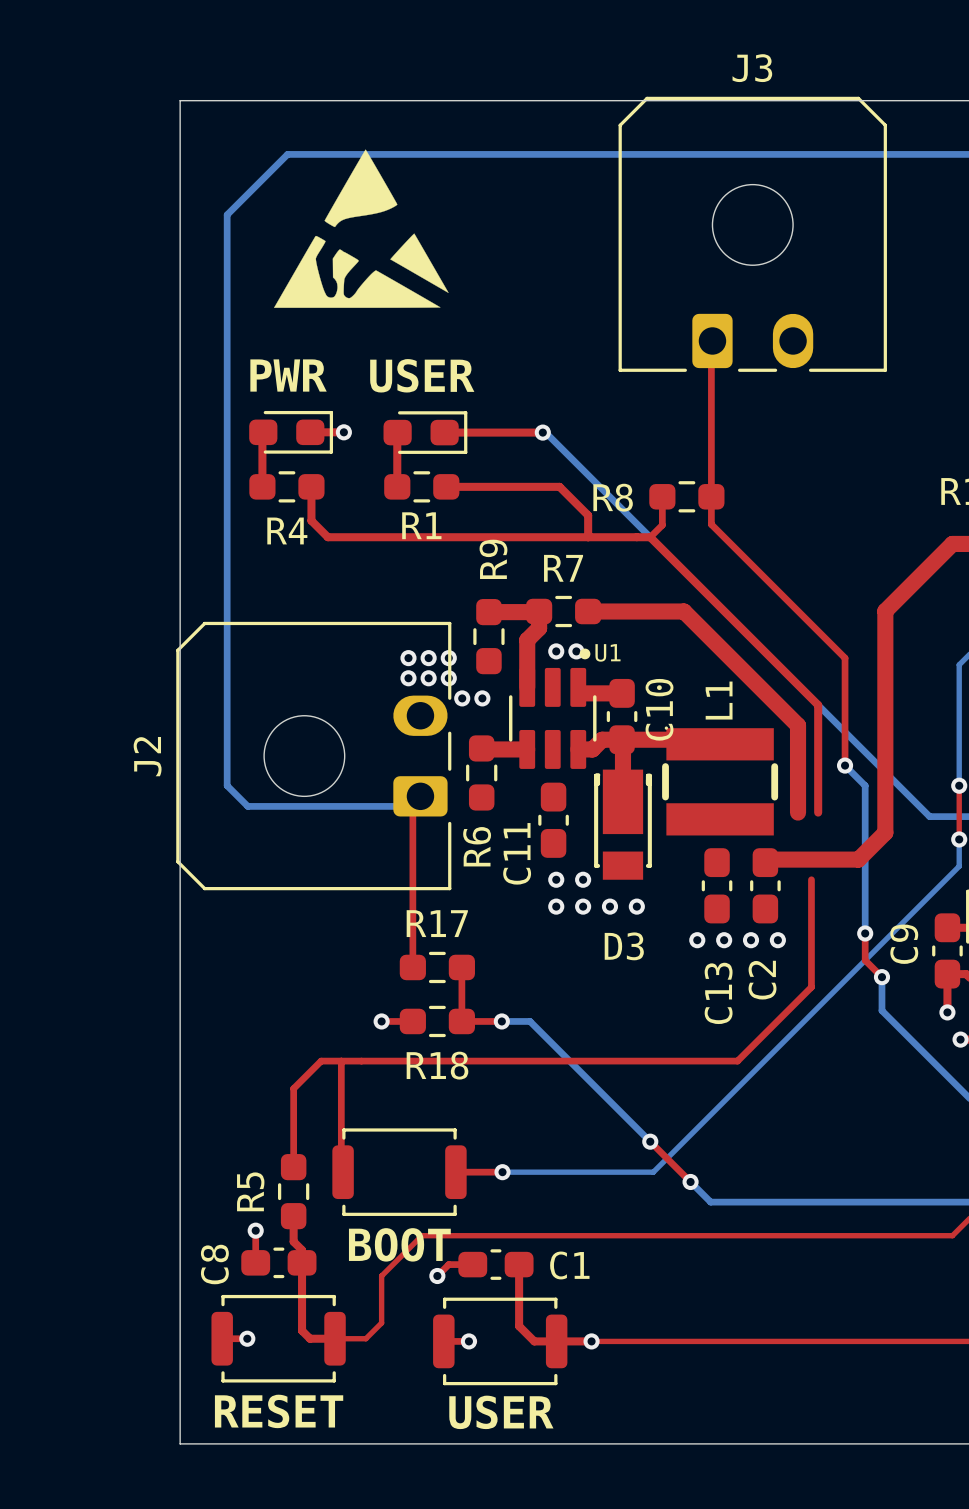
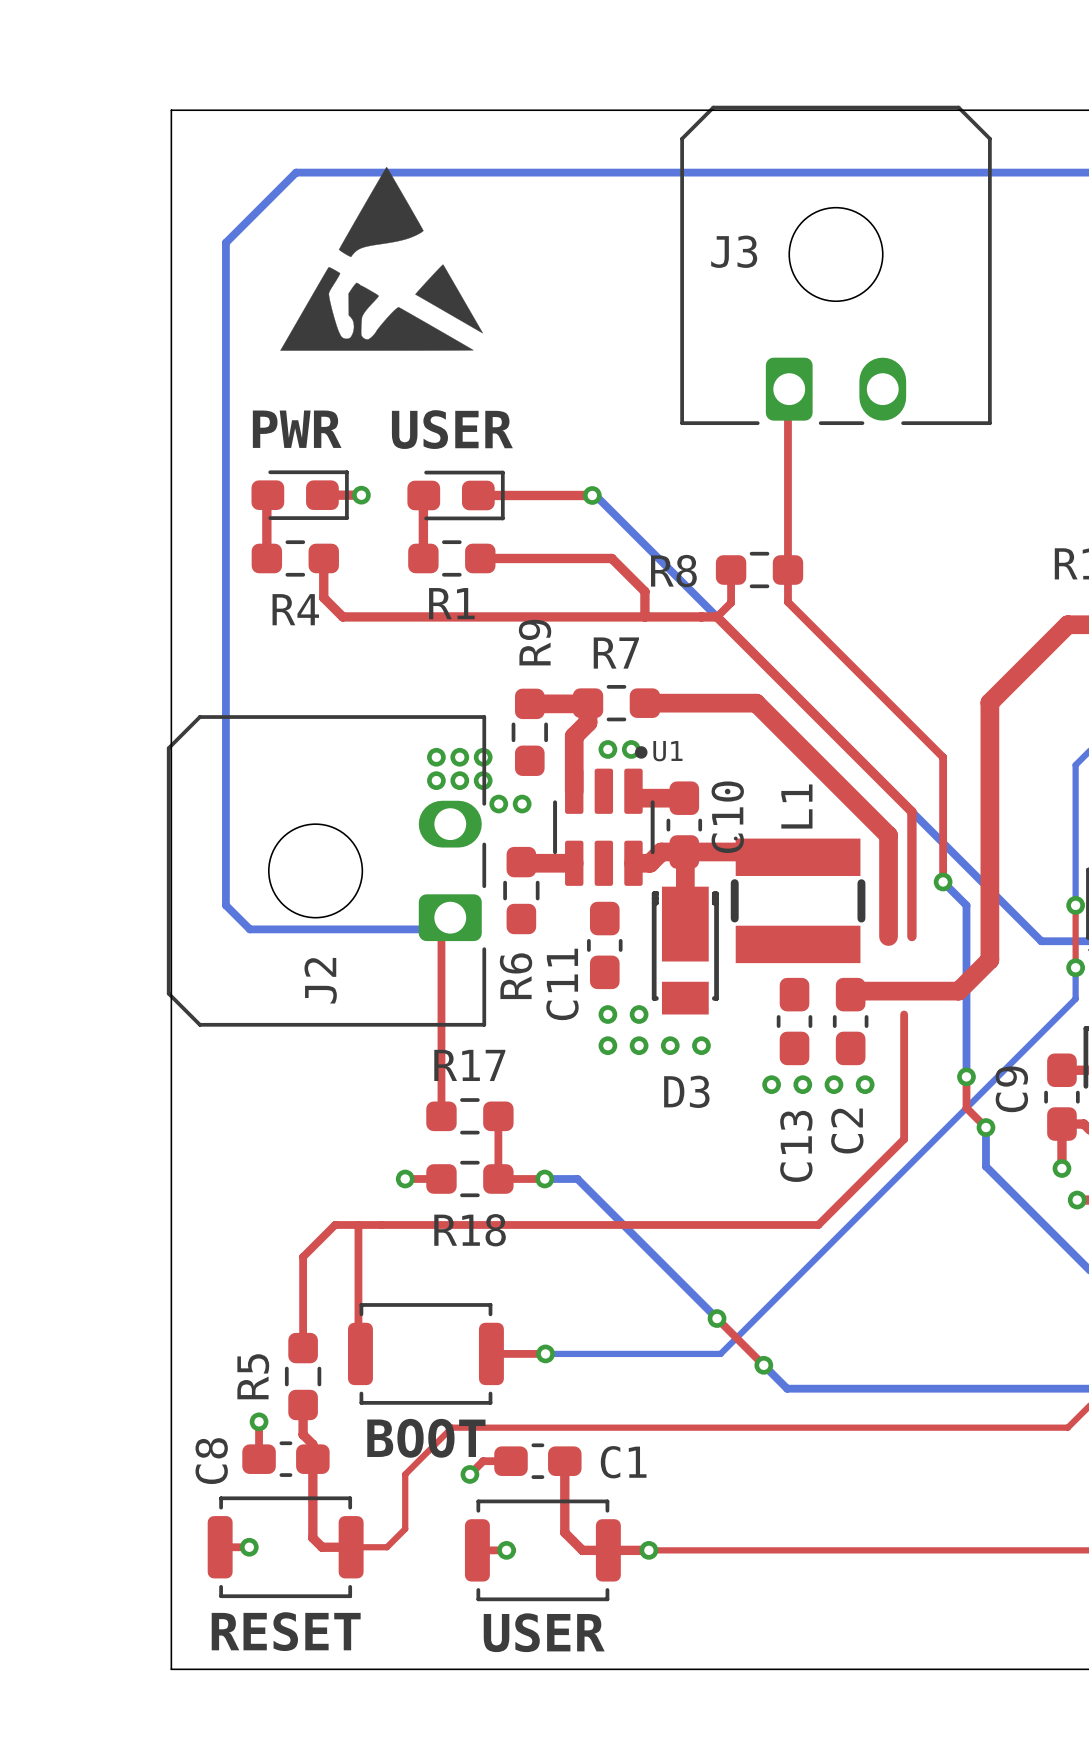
J3 name position: J3 (752, 68) -> J3 (734, 251)
J2 name position: J2 (147, 756) -> J2 (320, 980)

